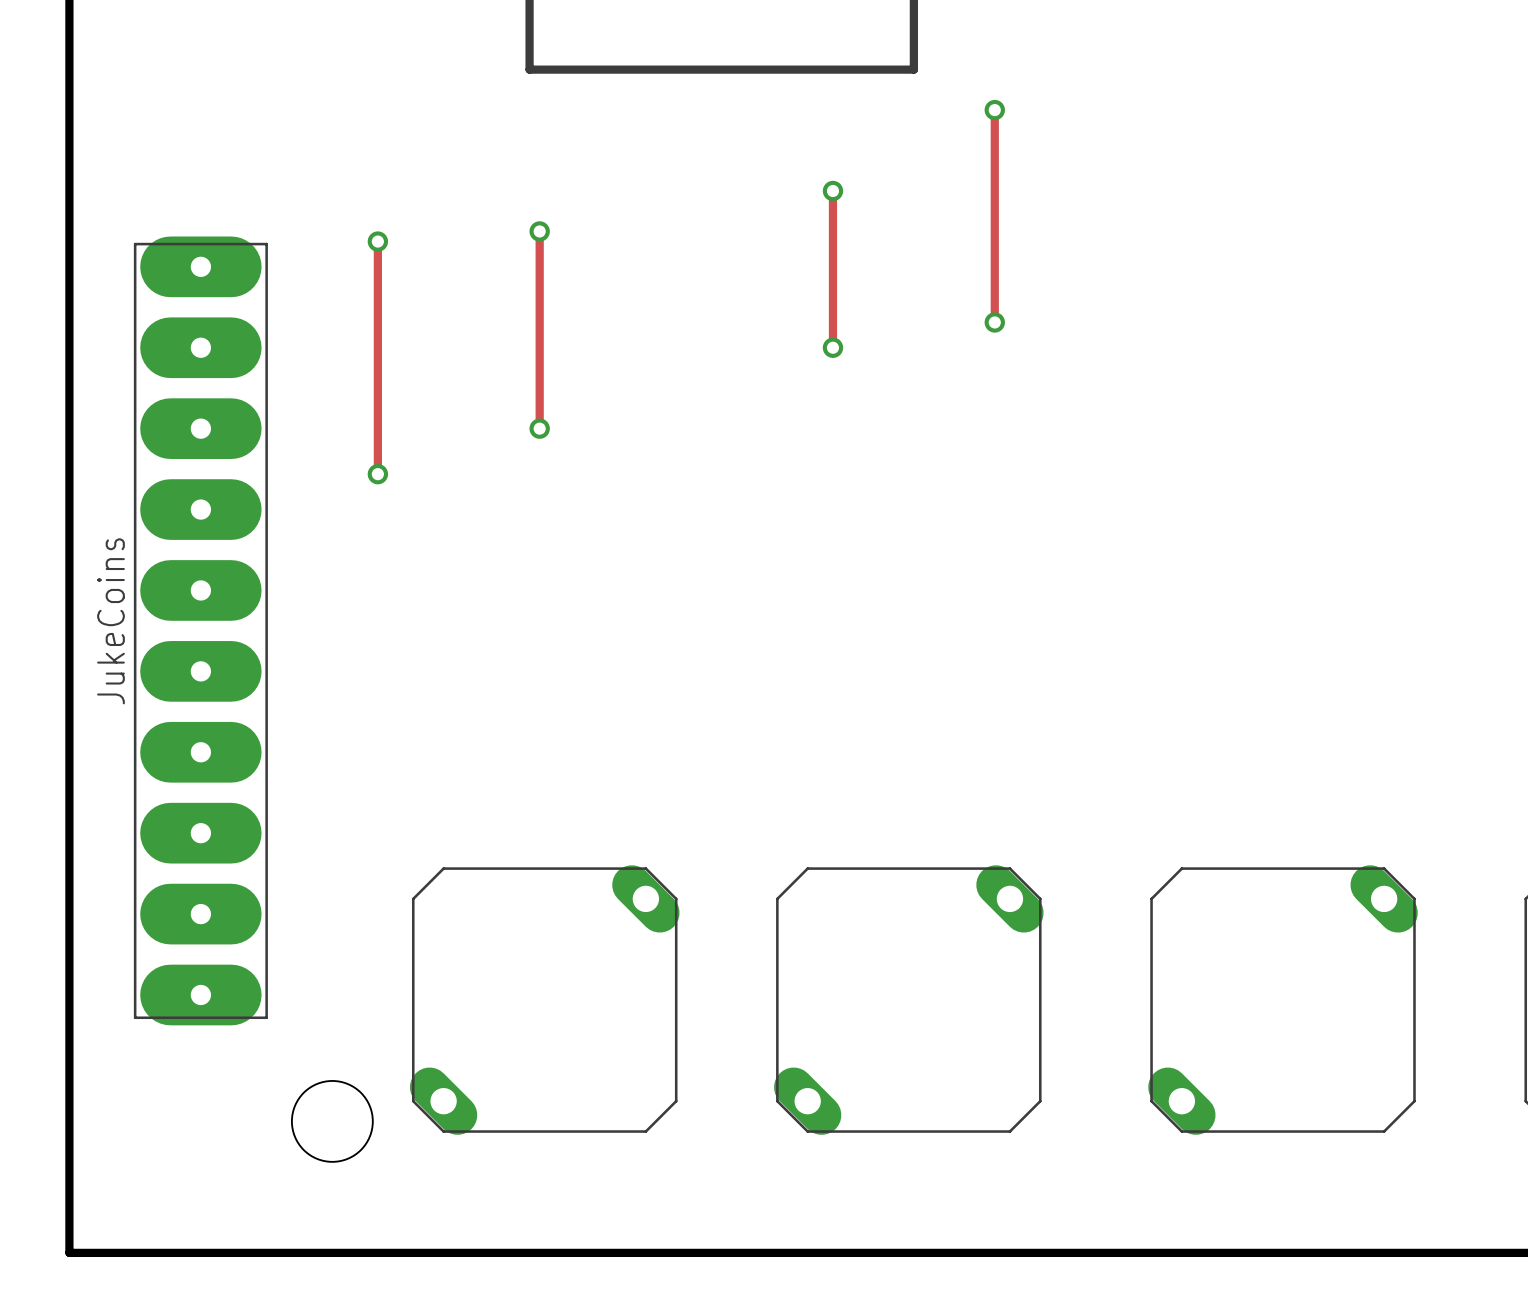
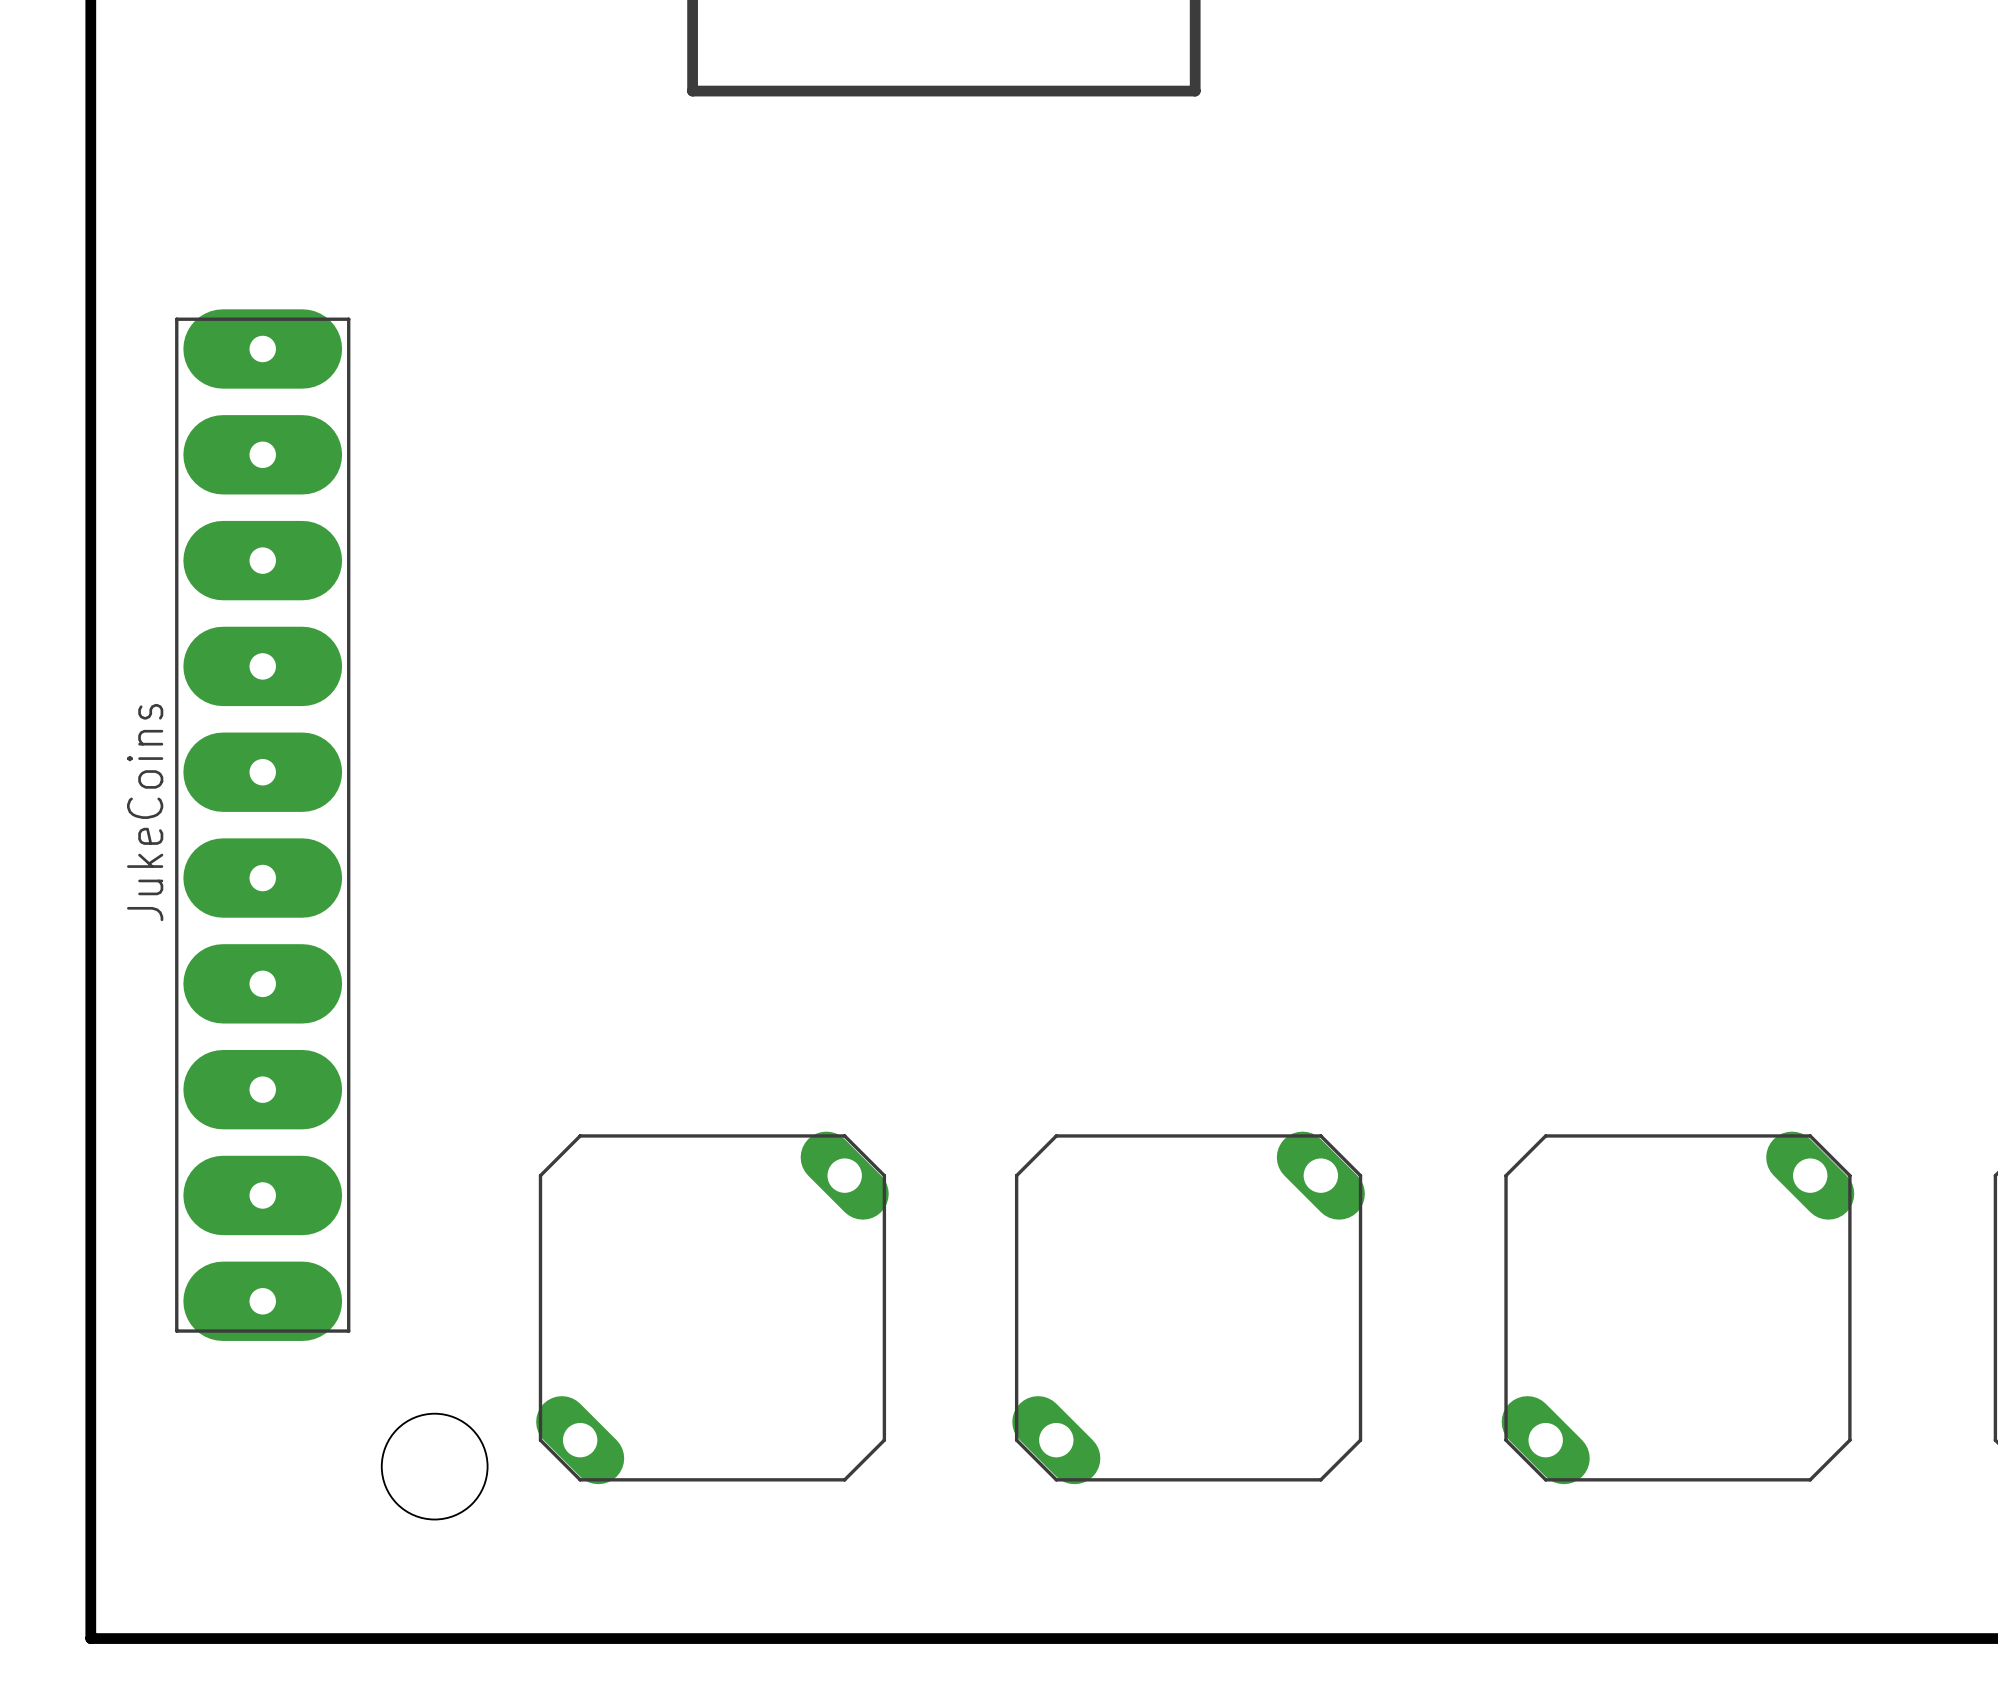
track: (994, 110) (994, 322) -> none
via: (994, 110) -> none
track: (832, 190) (832, 347) -> none
via: (832, 190) -> none
track: (539, 231) (539, 428) -> none
via: (539, 231) -> none
track: (377, 241) (377, 474) -> none
via: (377, 241) -> none
via: (994, 322) -> none
via: (832, 347) -> none
via: (539, 428) -> none
via: (377, 474) -> none

